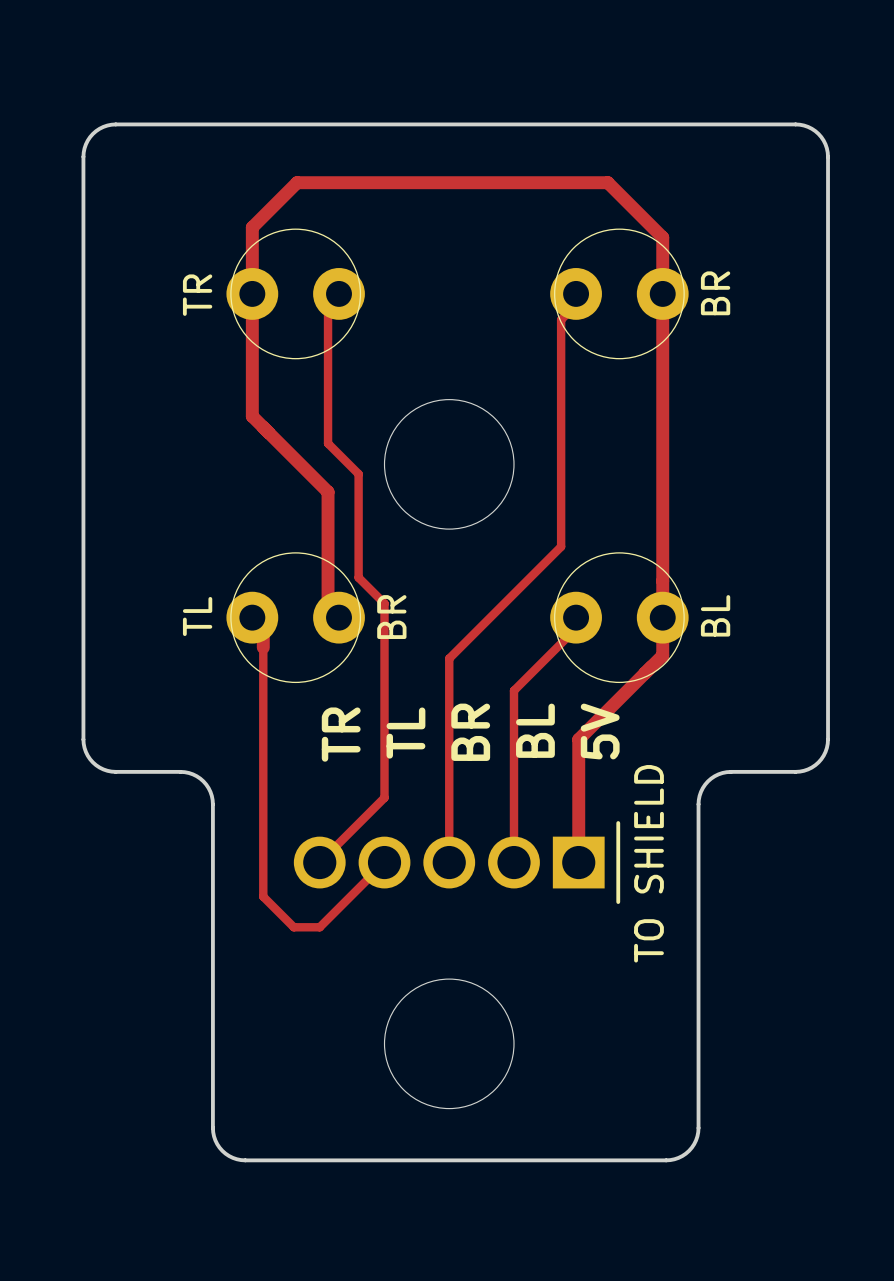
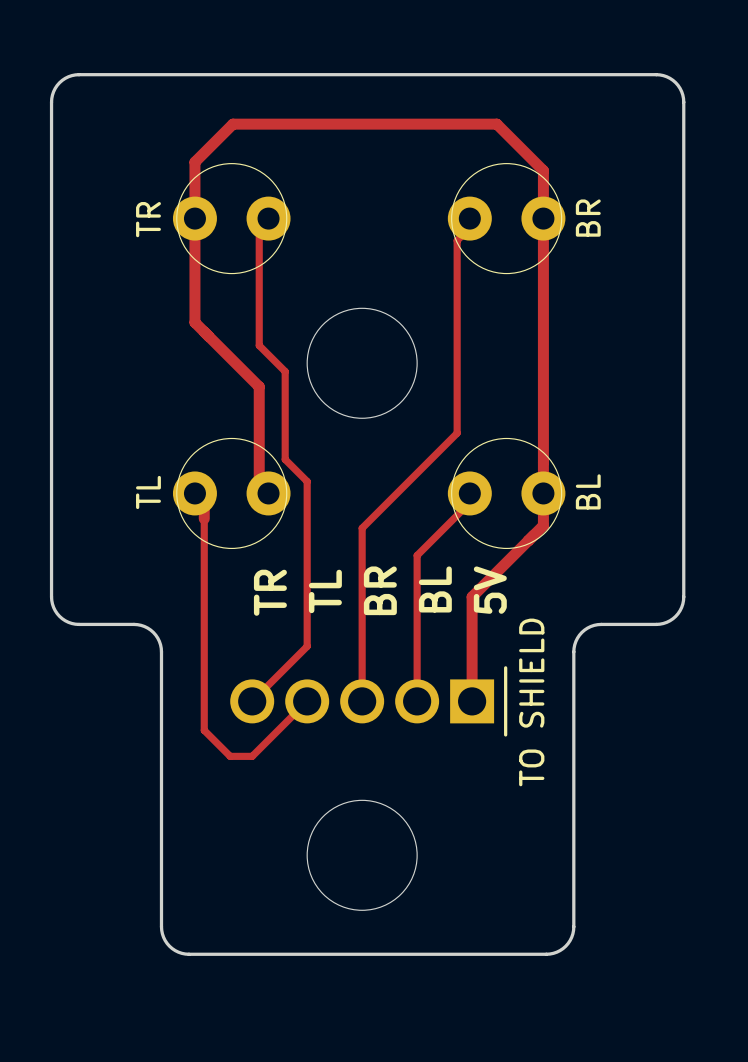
part text: BR (391, 617) -> none

